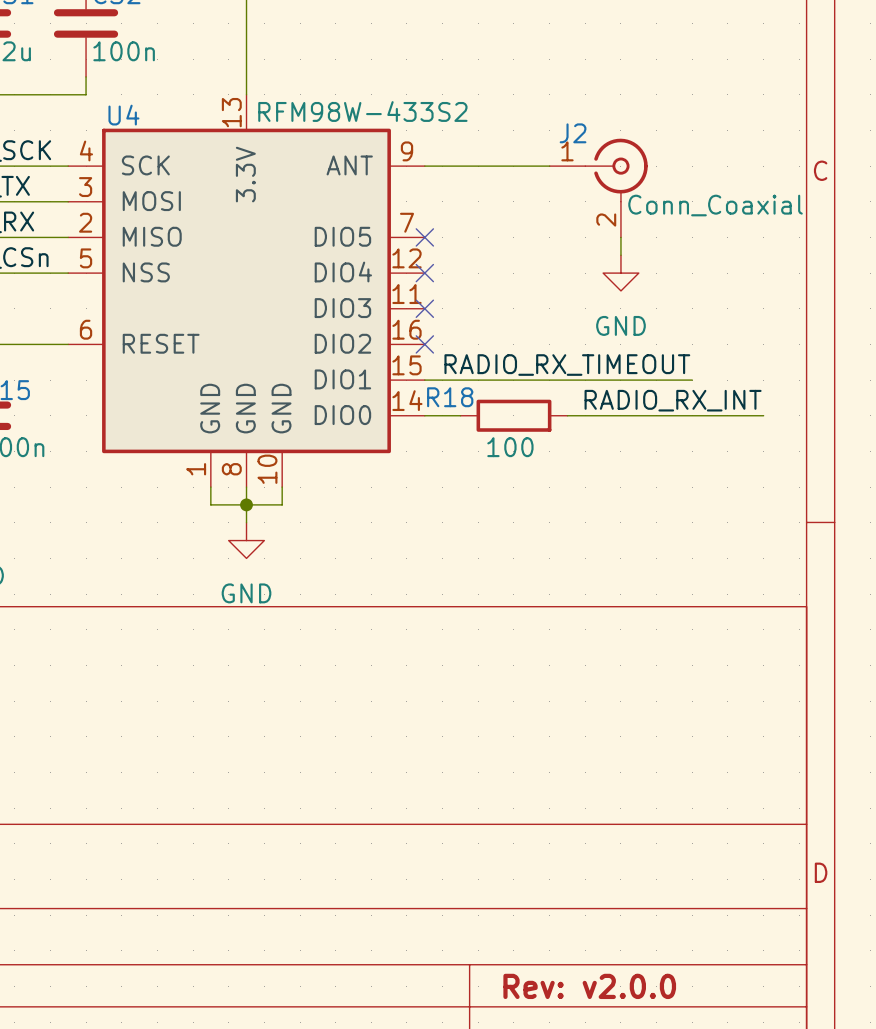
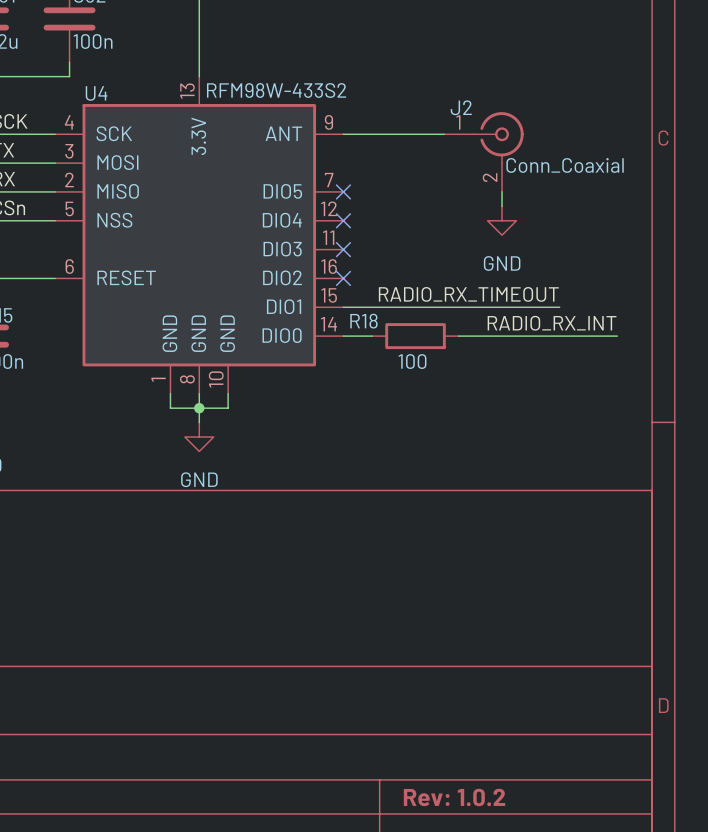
title block: Rev: v2.0.0 (589, 986) -> Rev: 1.0.2 (454, 797)

